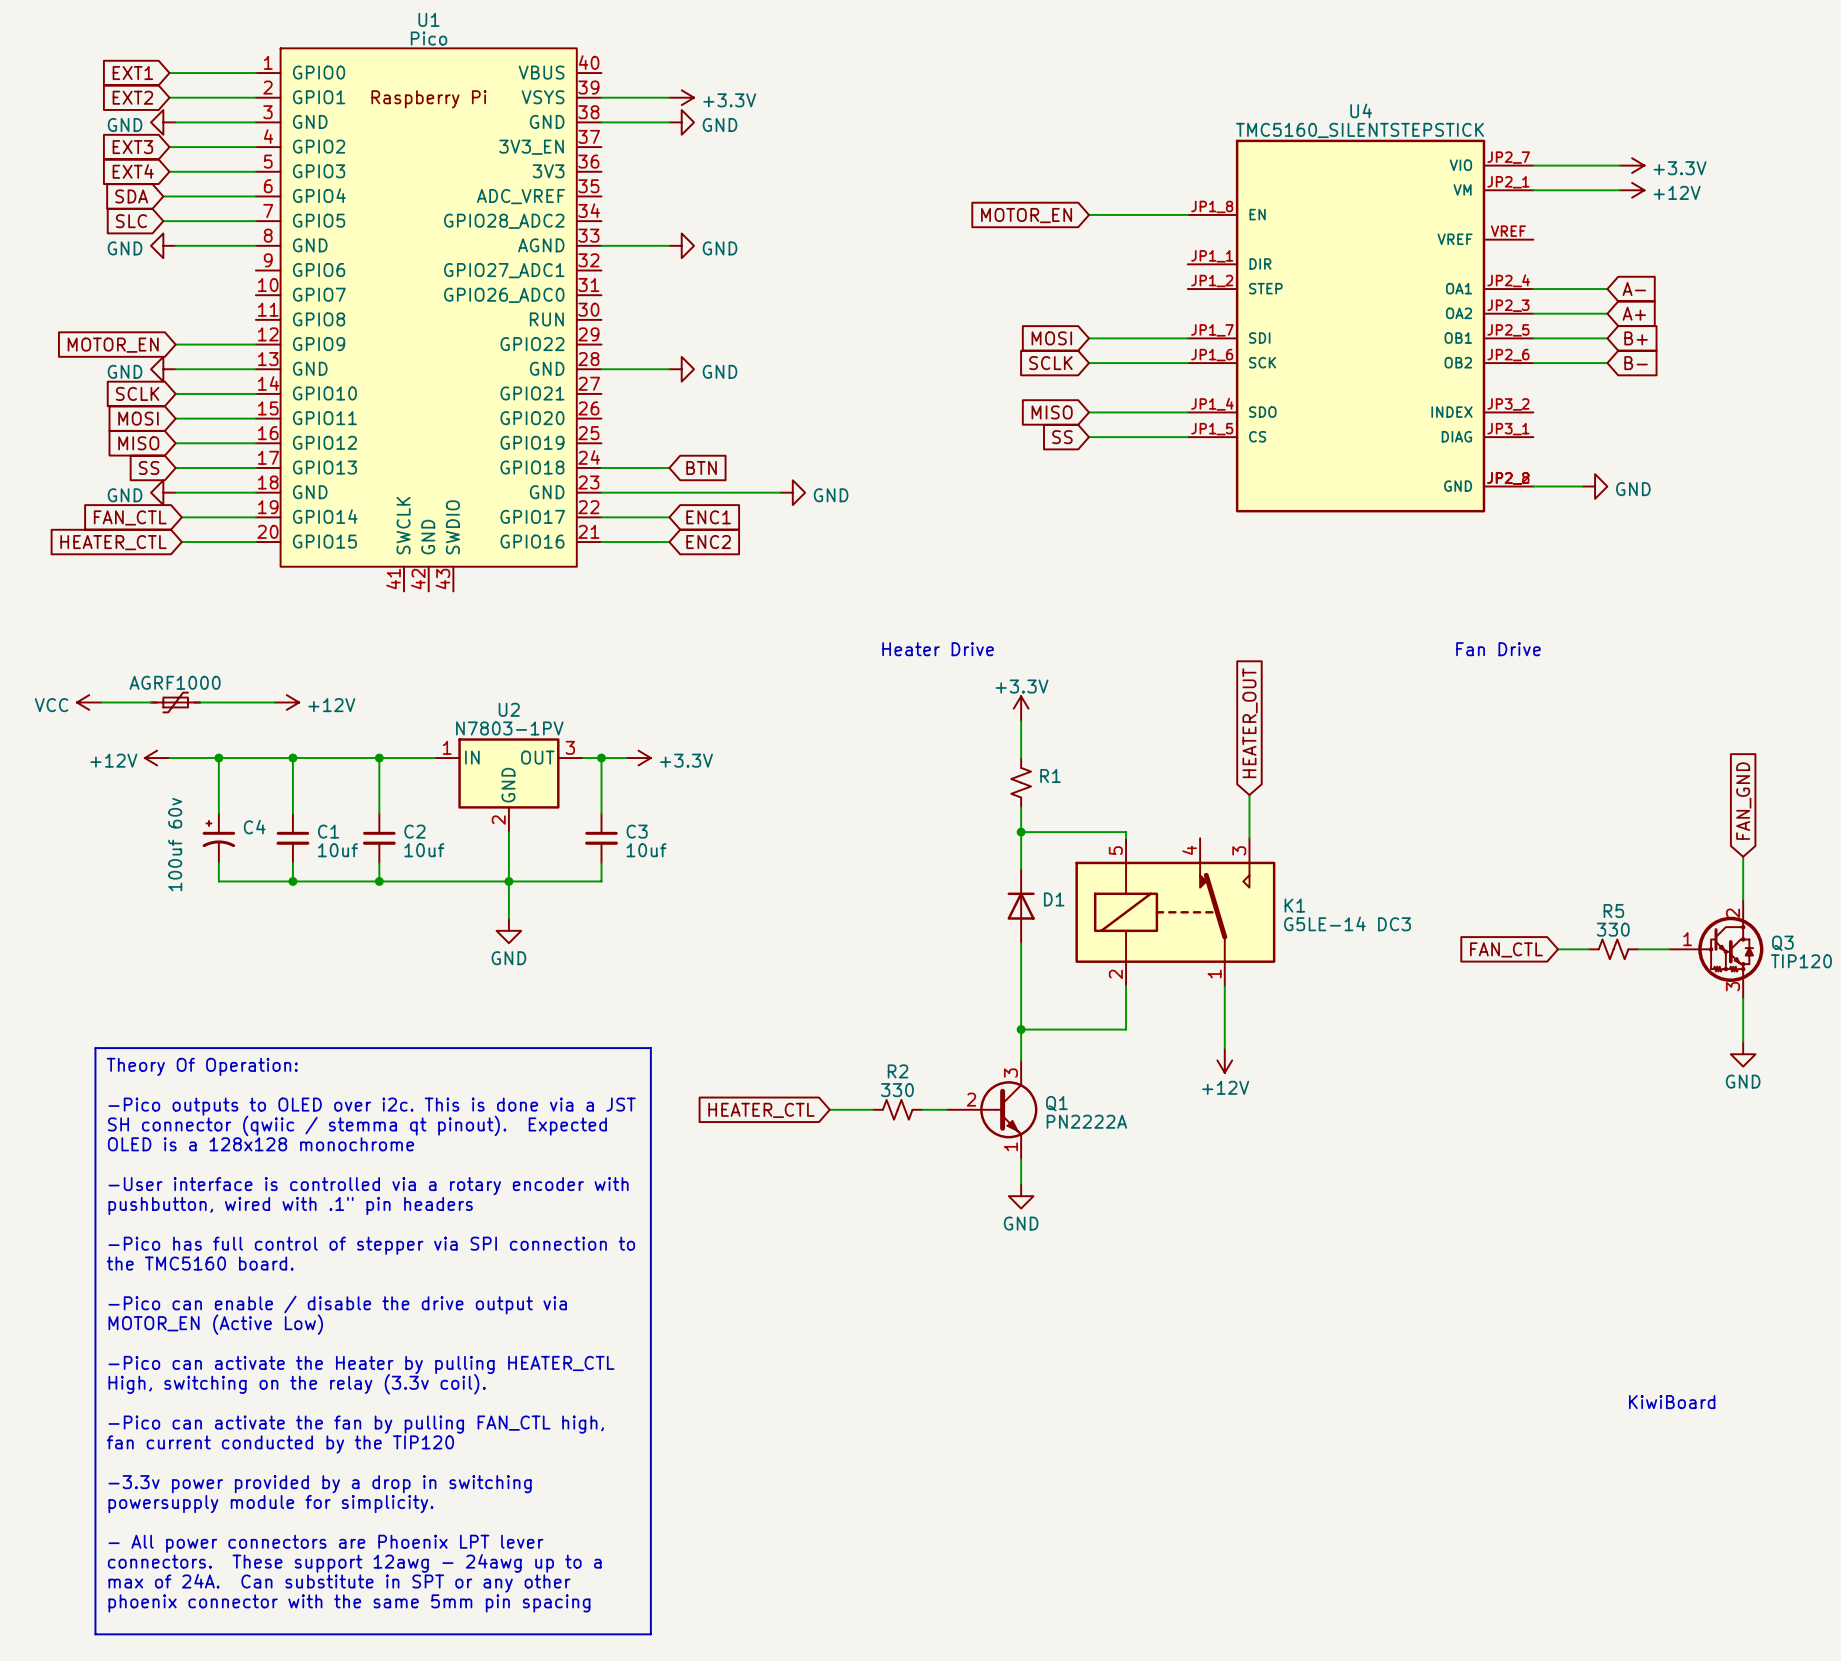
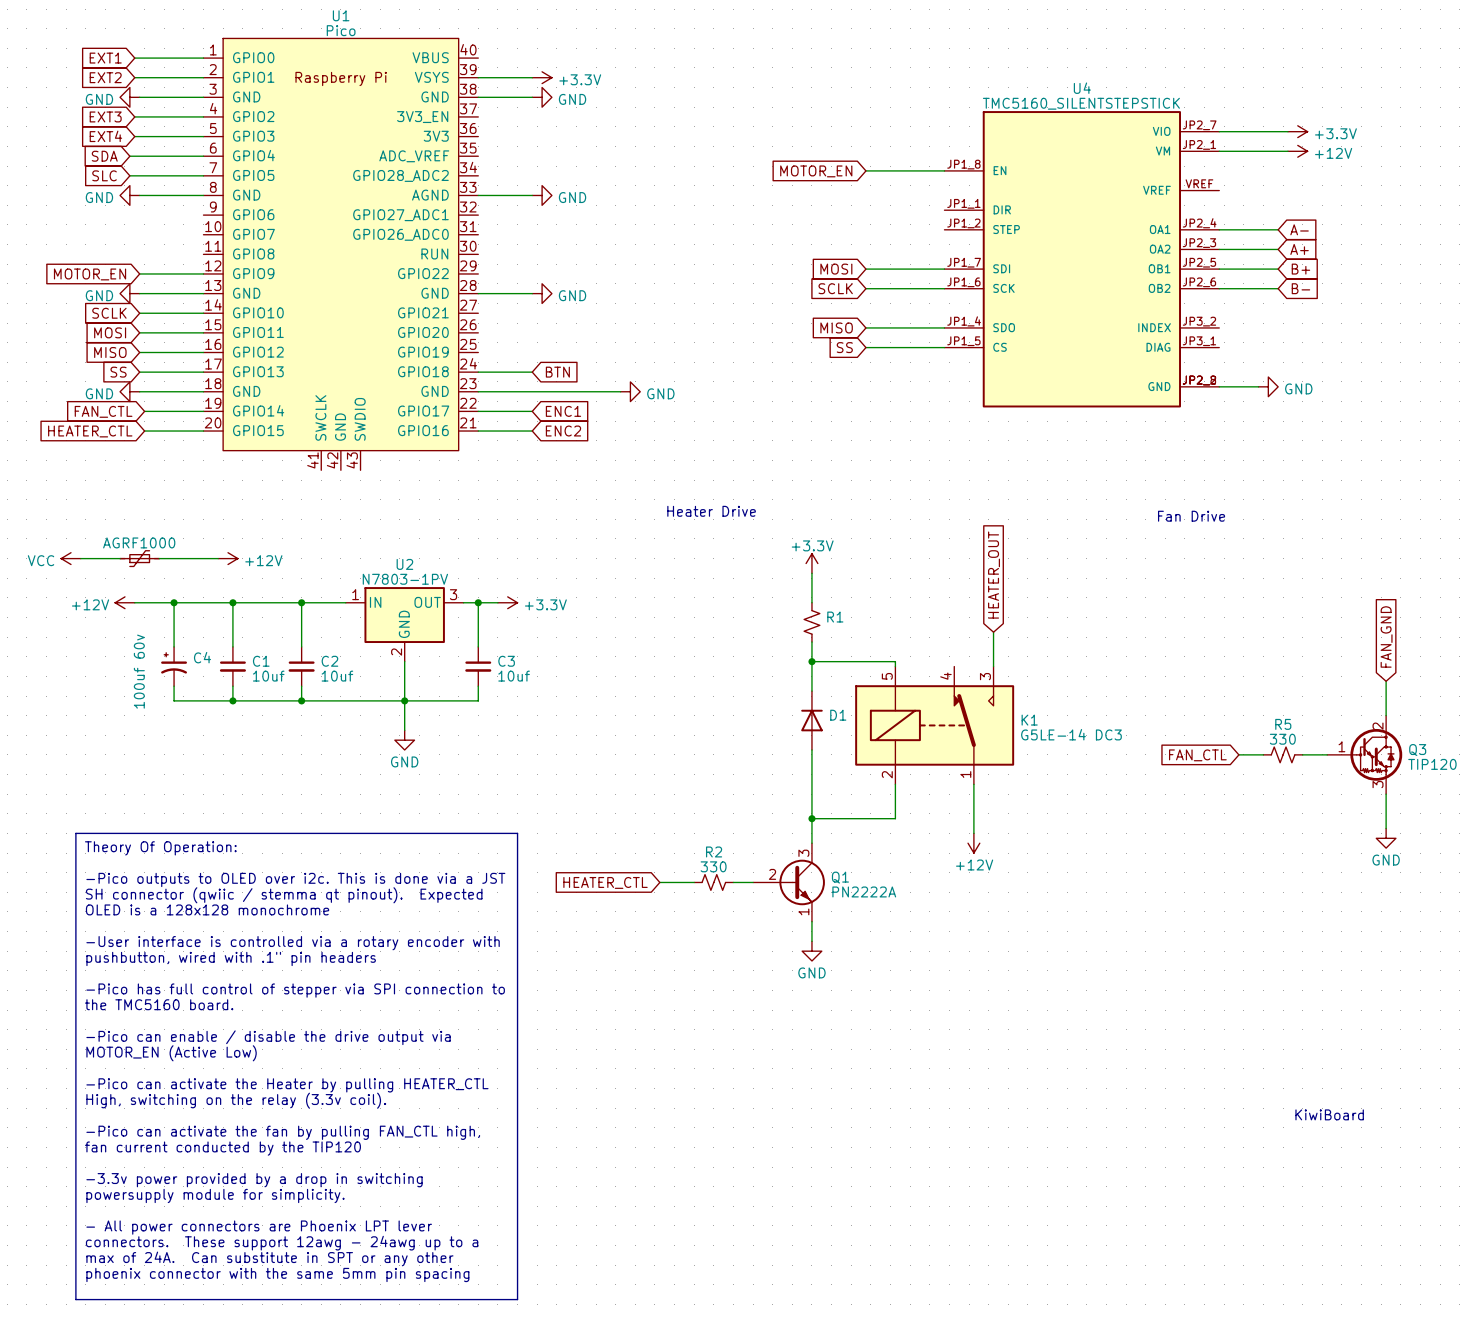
text position: Heater Drive (938, 649) -> Heater Drive (711, 511)

